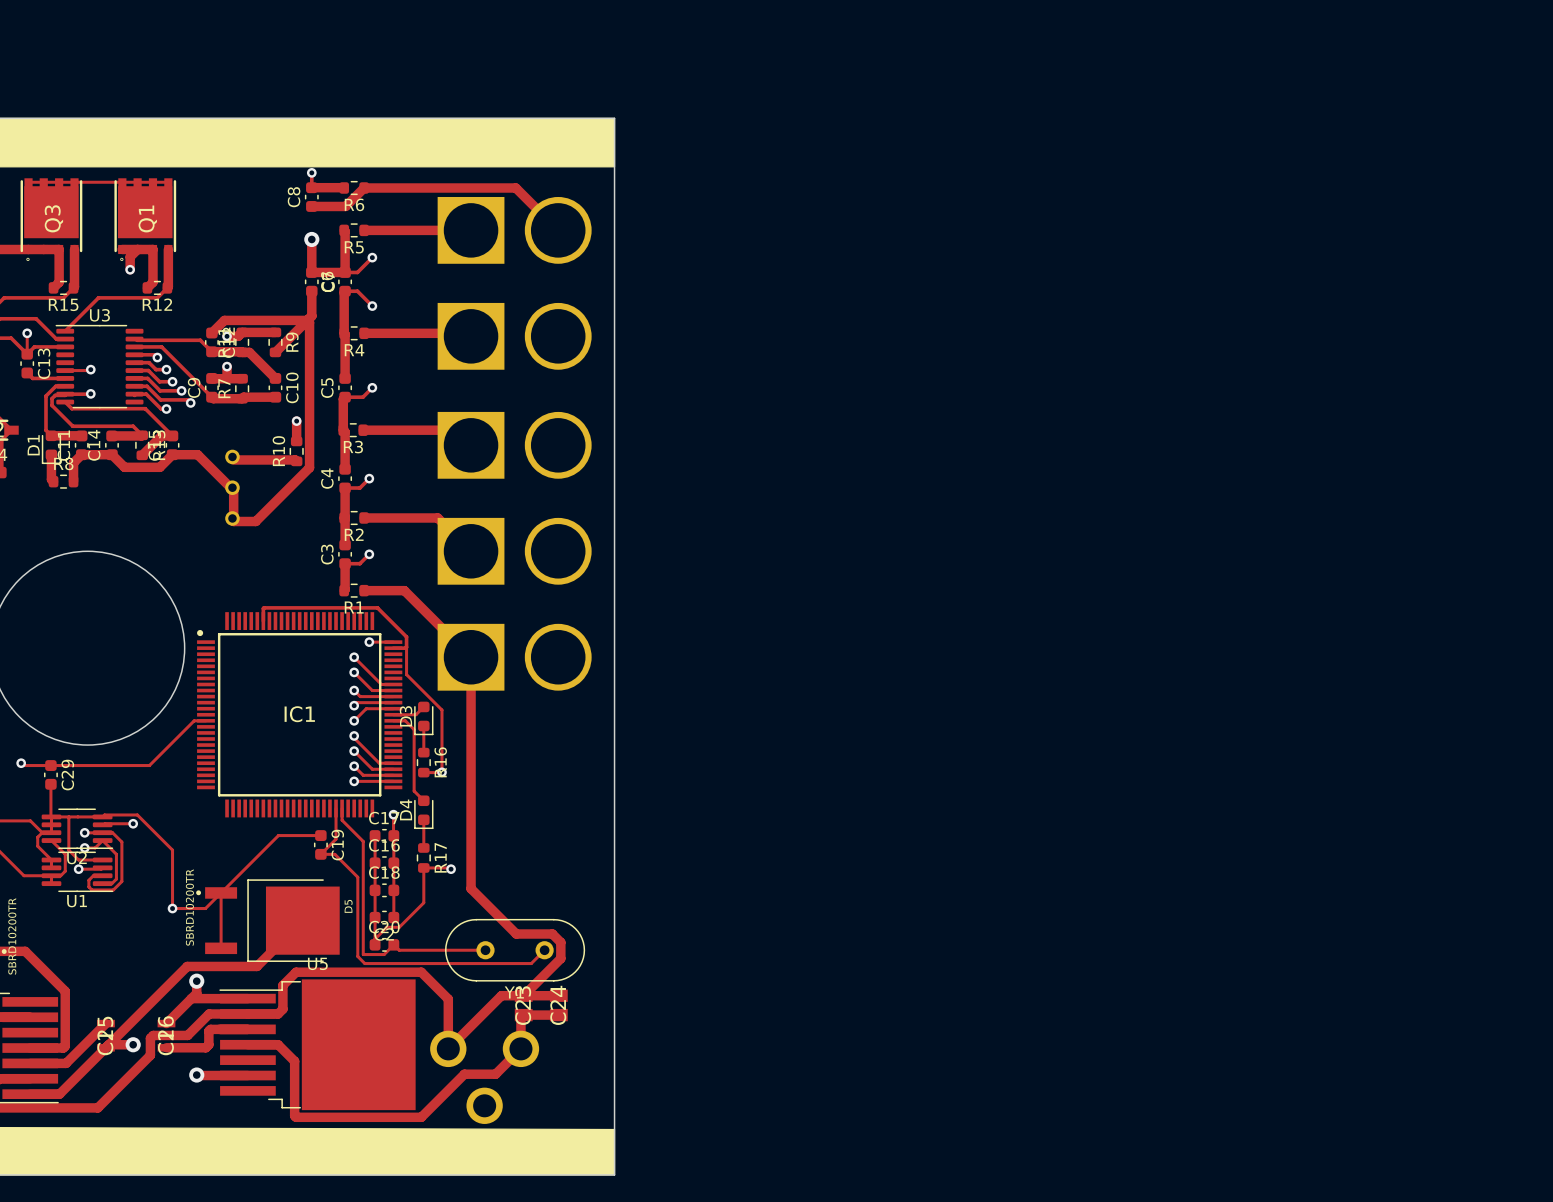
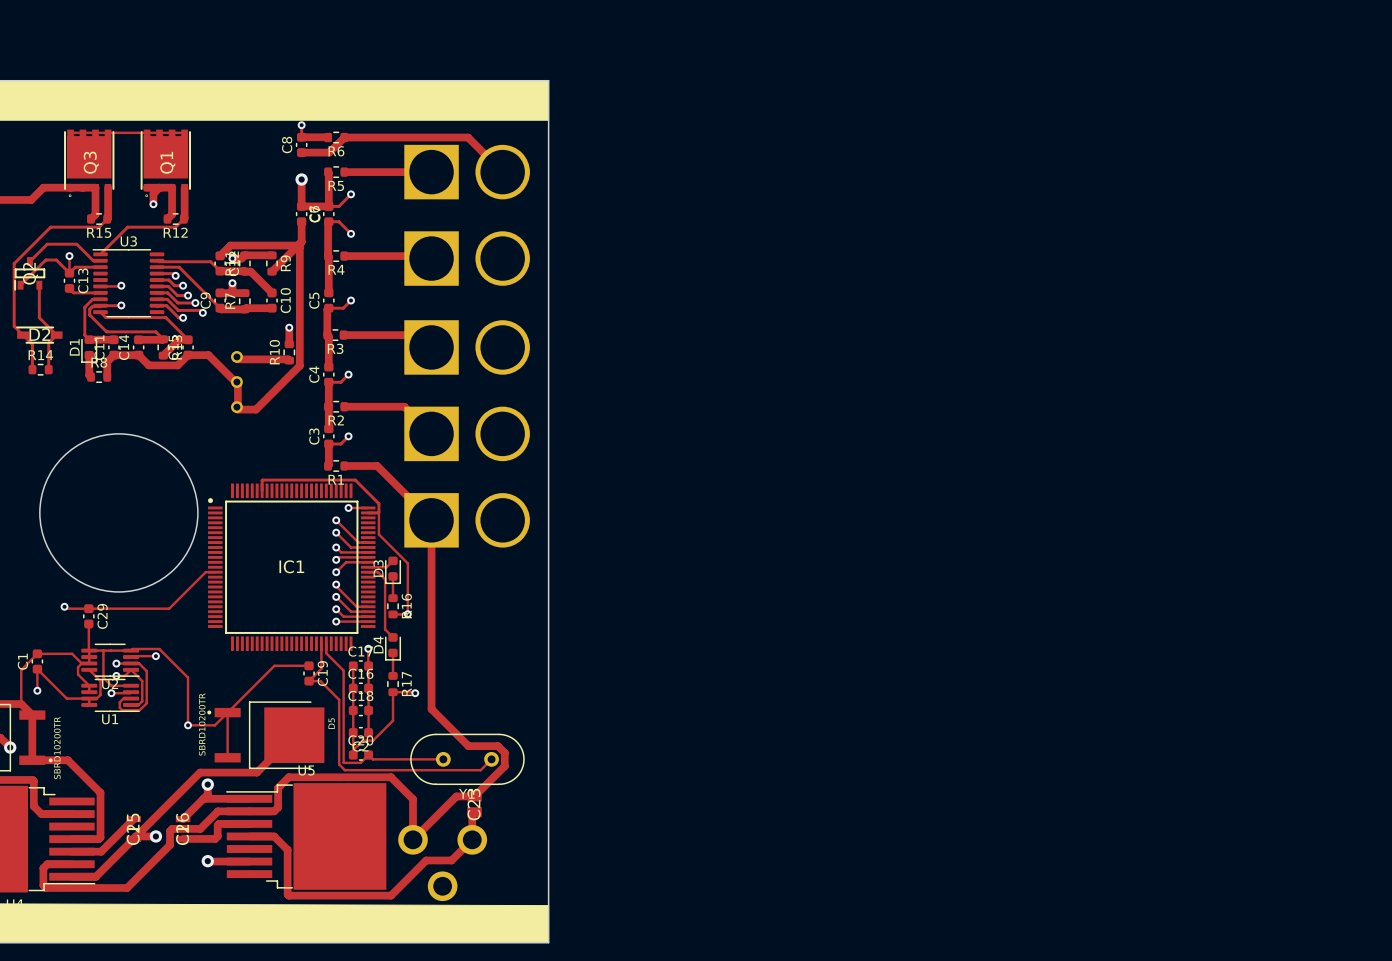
track: (523, 995) (558, 995) -> none
C24: (558, 1005) -> none
track: (523, 1015) (558, 1015) -> none

